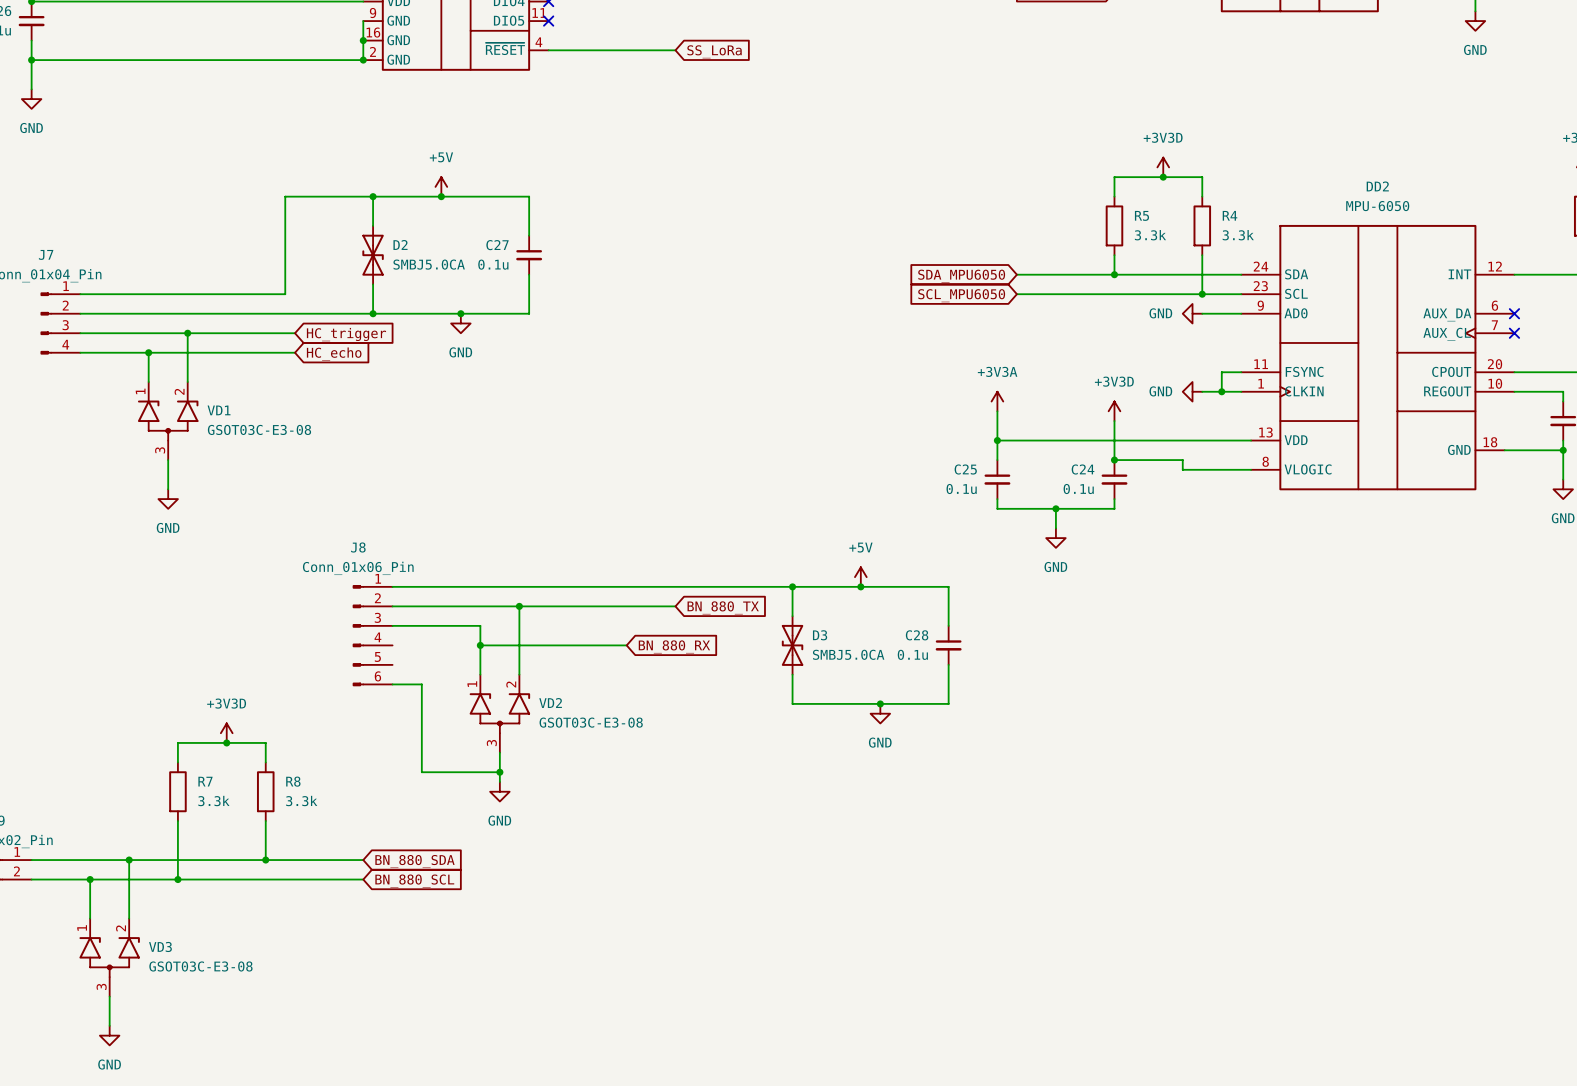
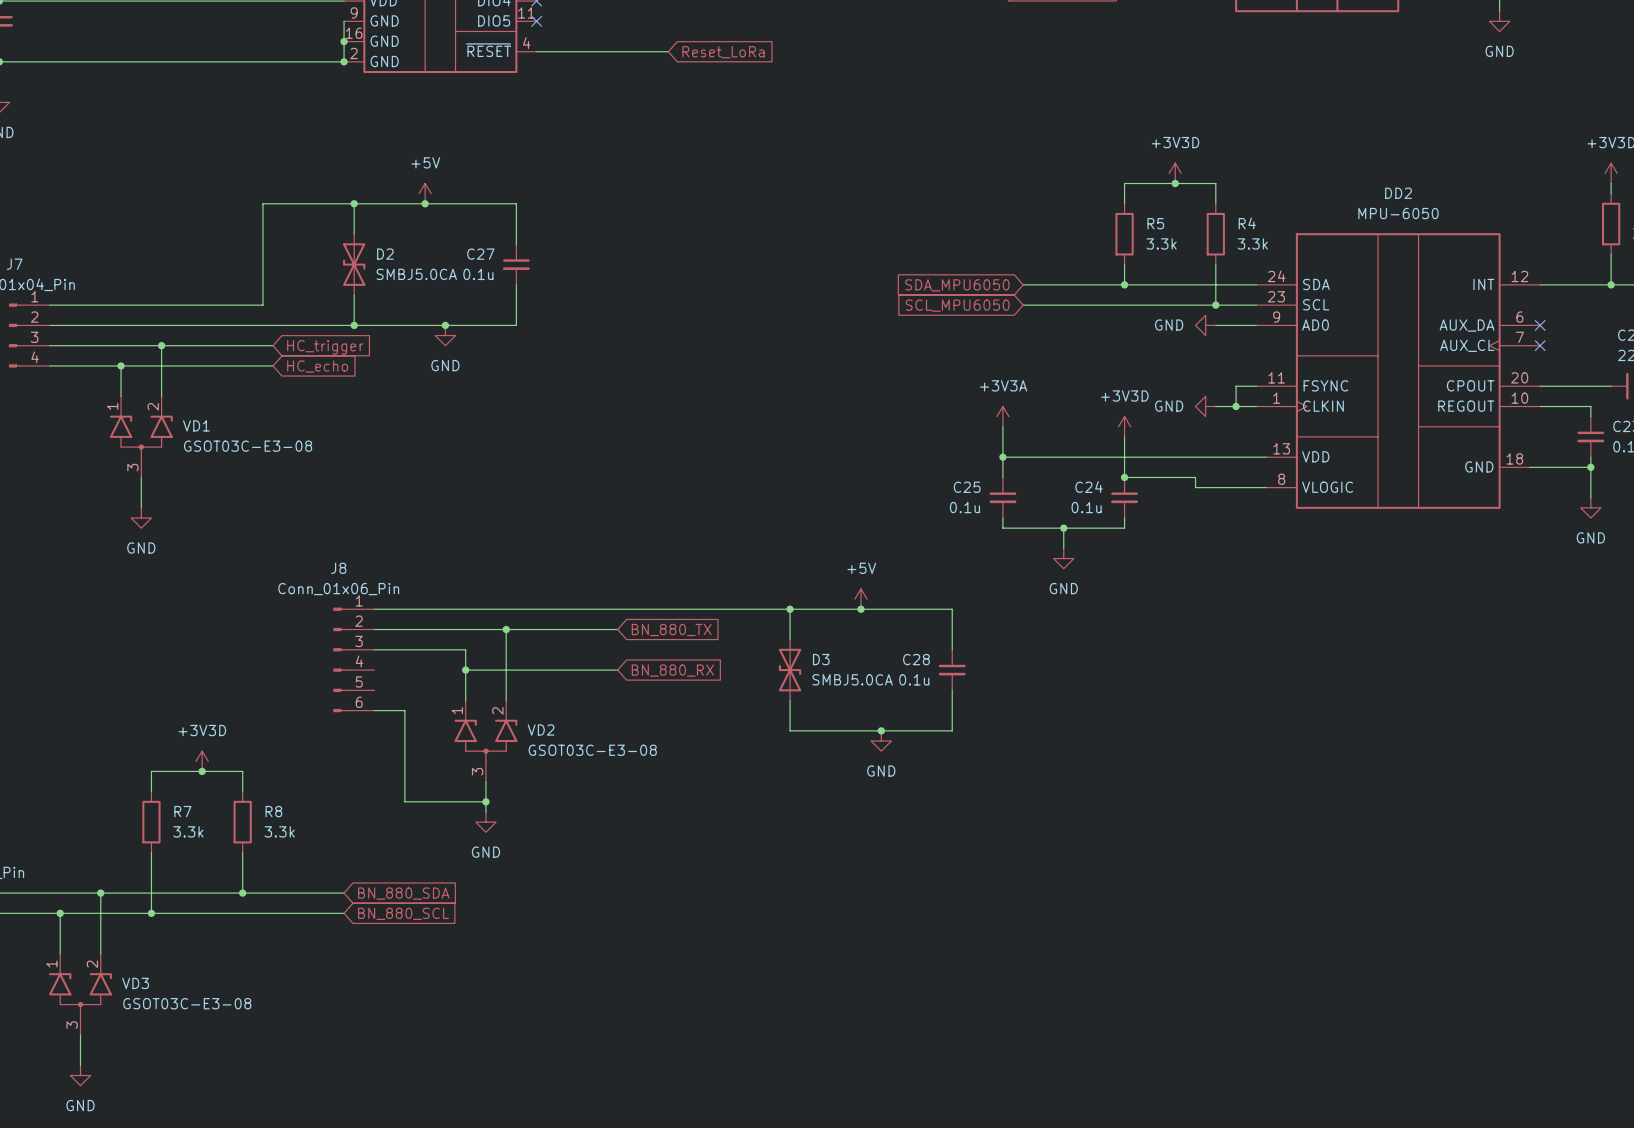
global label: SS_LoRa (714, 51) -> Reset_LoRa (723, 52)
wire: (626, 606) (675, 606) -> none
global label position: BN_880_TX (723, 607) -> BN_880_TX (671, 630)

